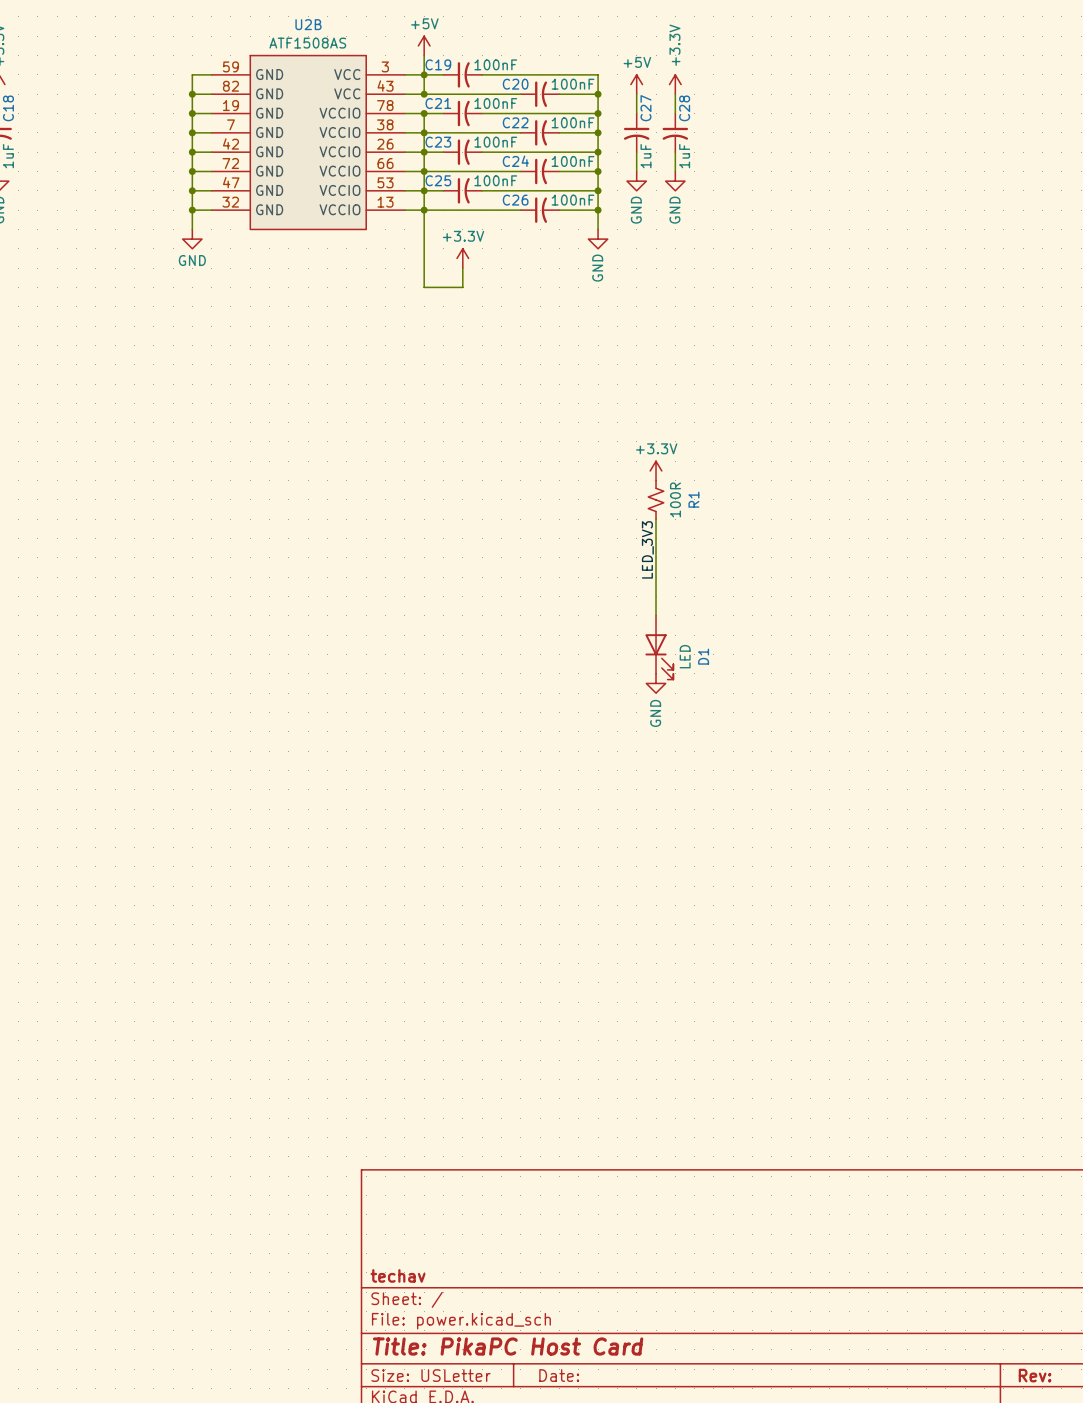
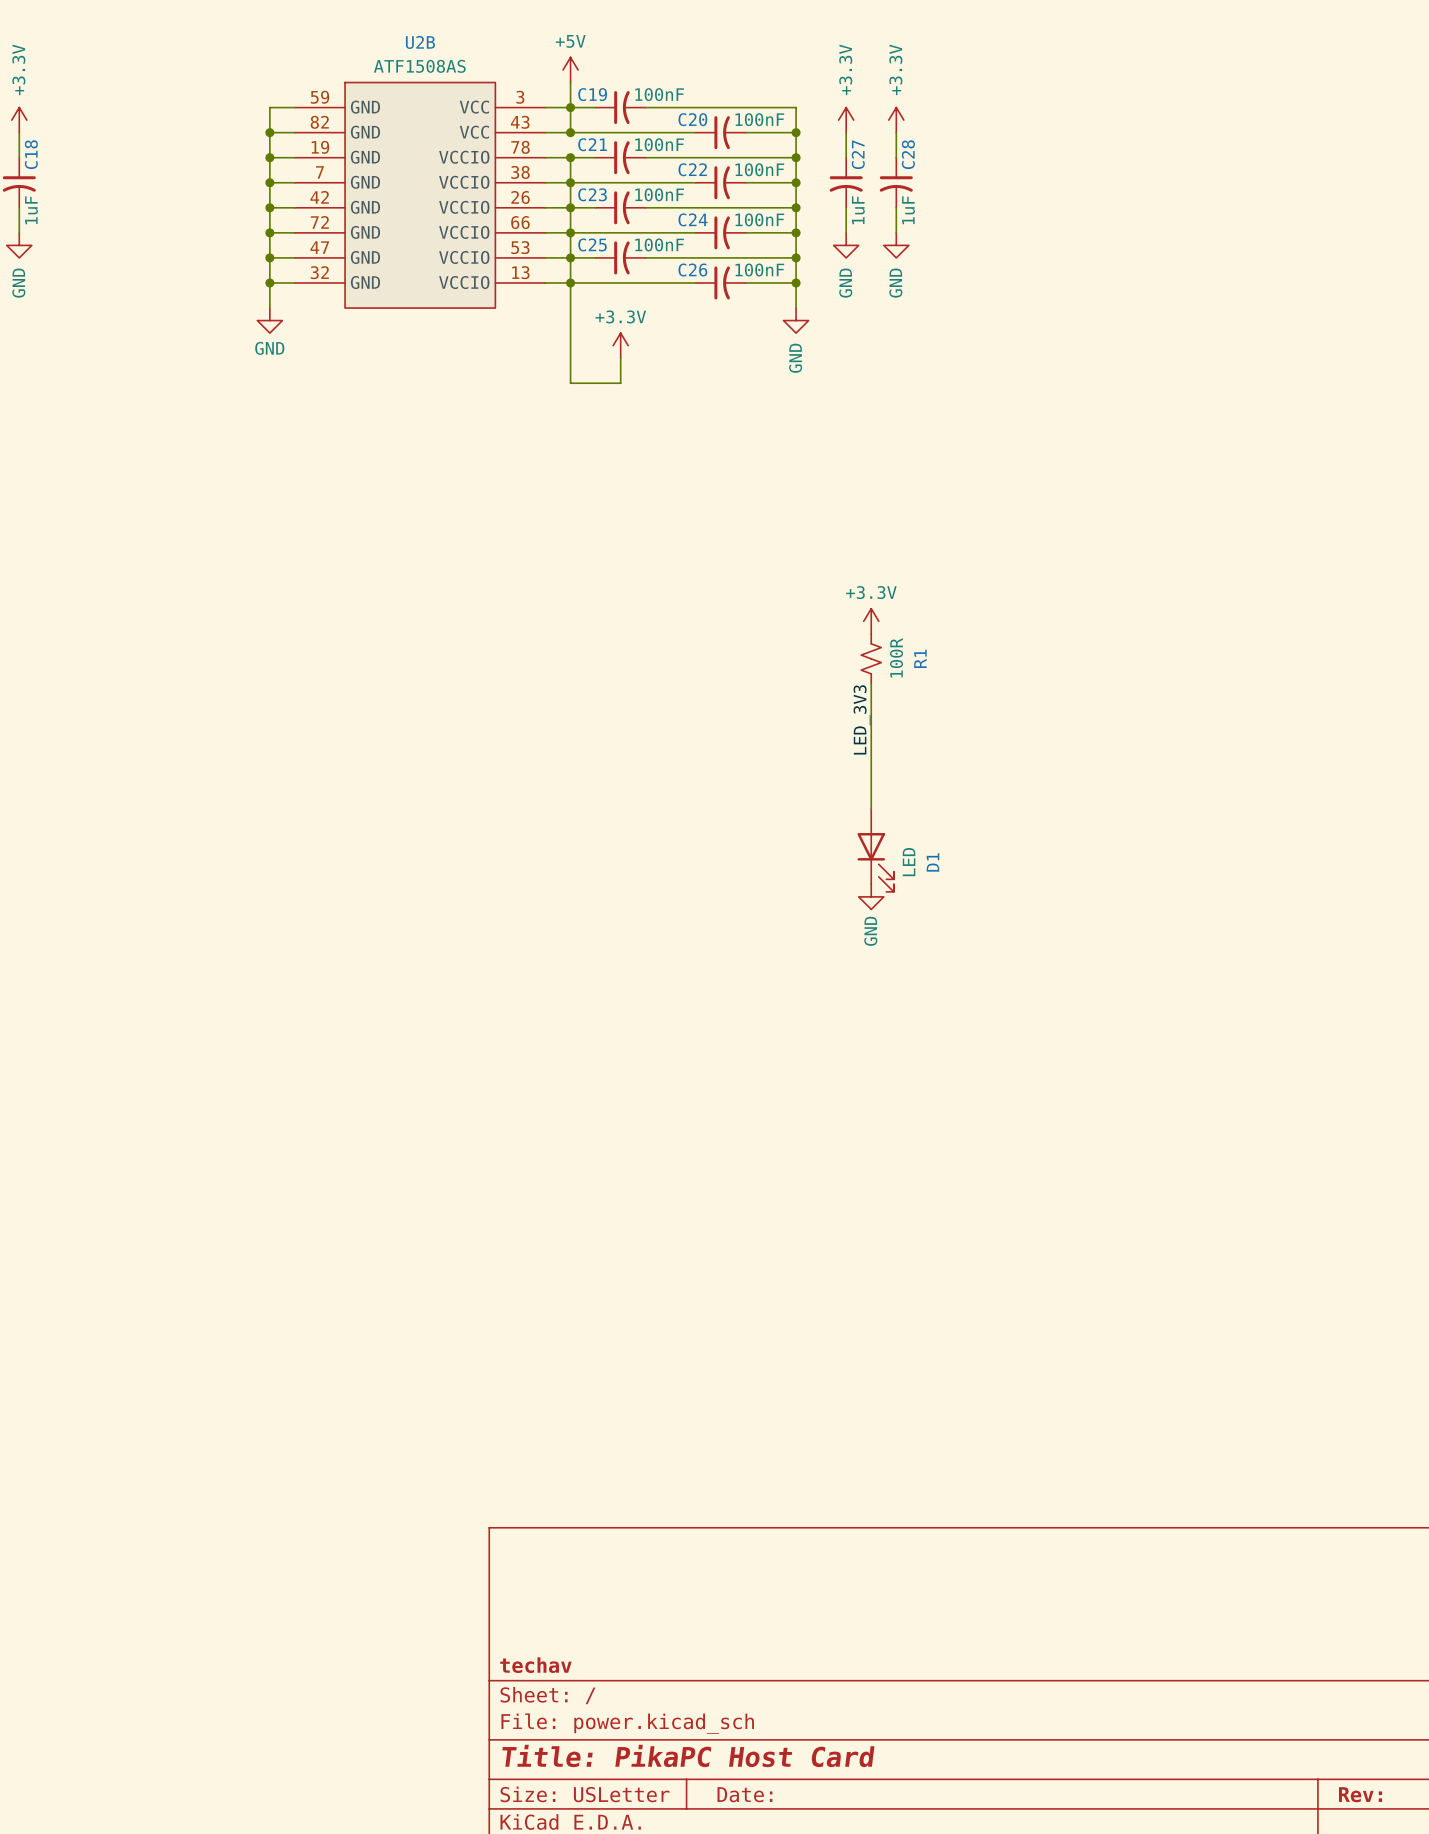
power symbol: +5V (636, 84) -> +3.3V (846, 120)

